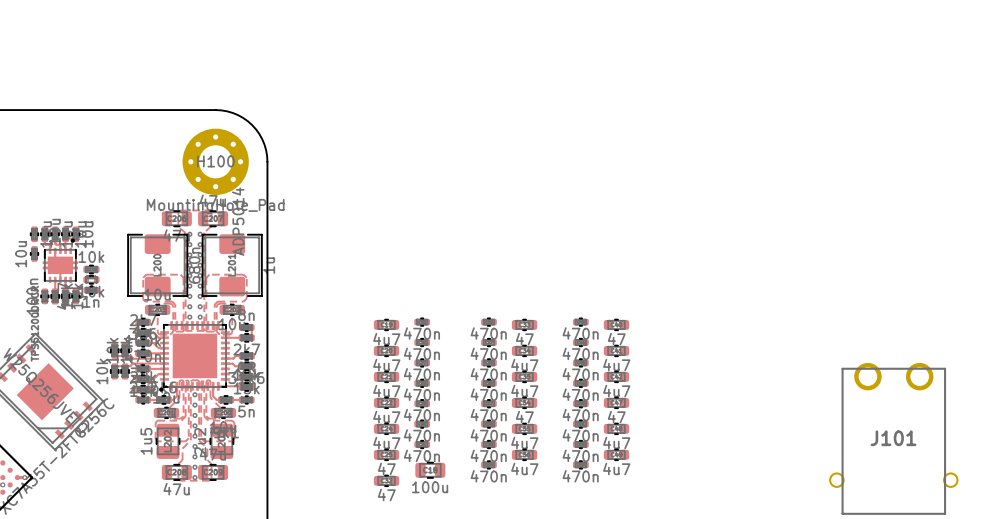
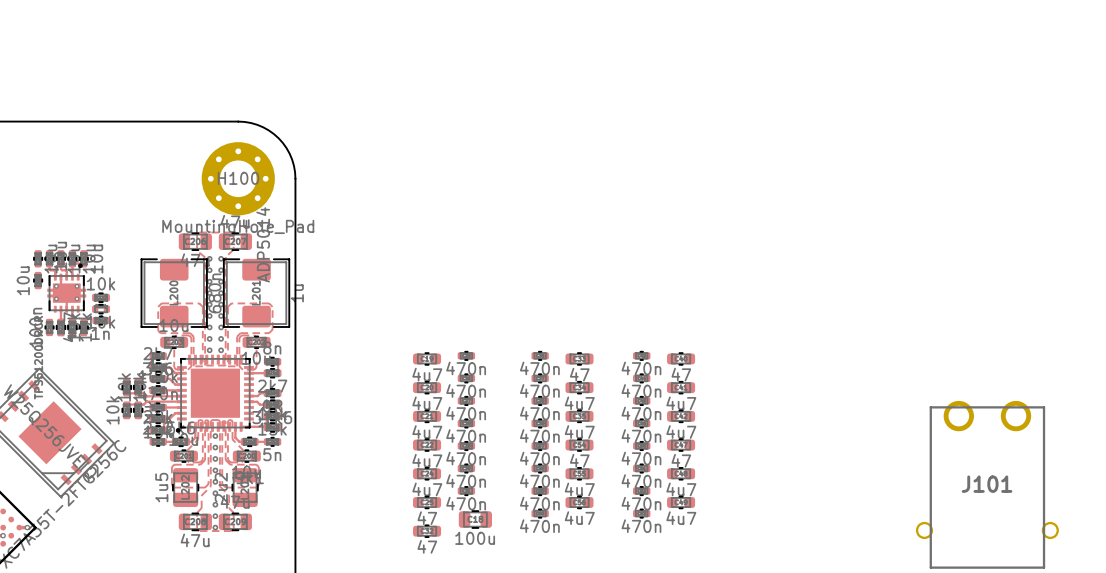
via: none -> (56, 286)
via: none -> (77, 286)
via: none -> (56, 298)
via: none -> (77, 298)

